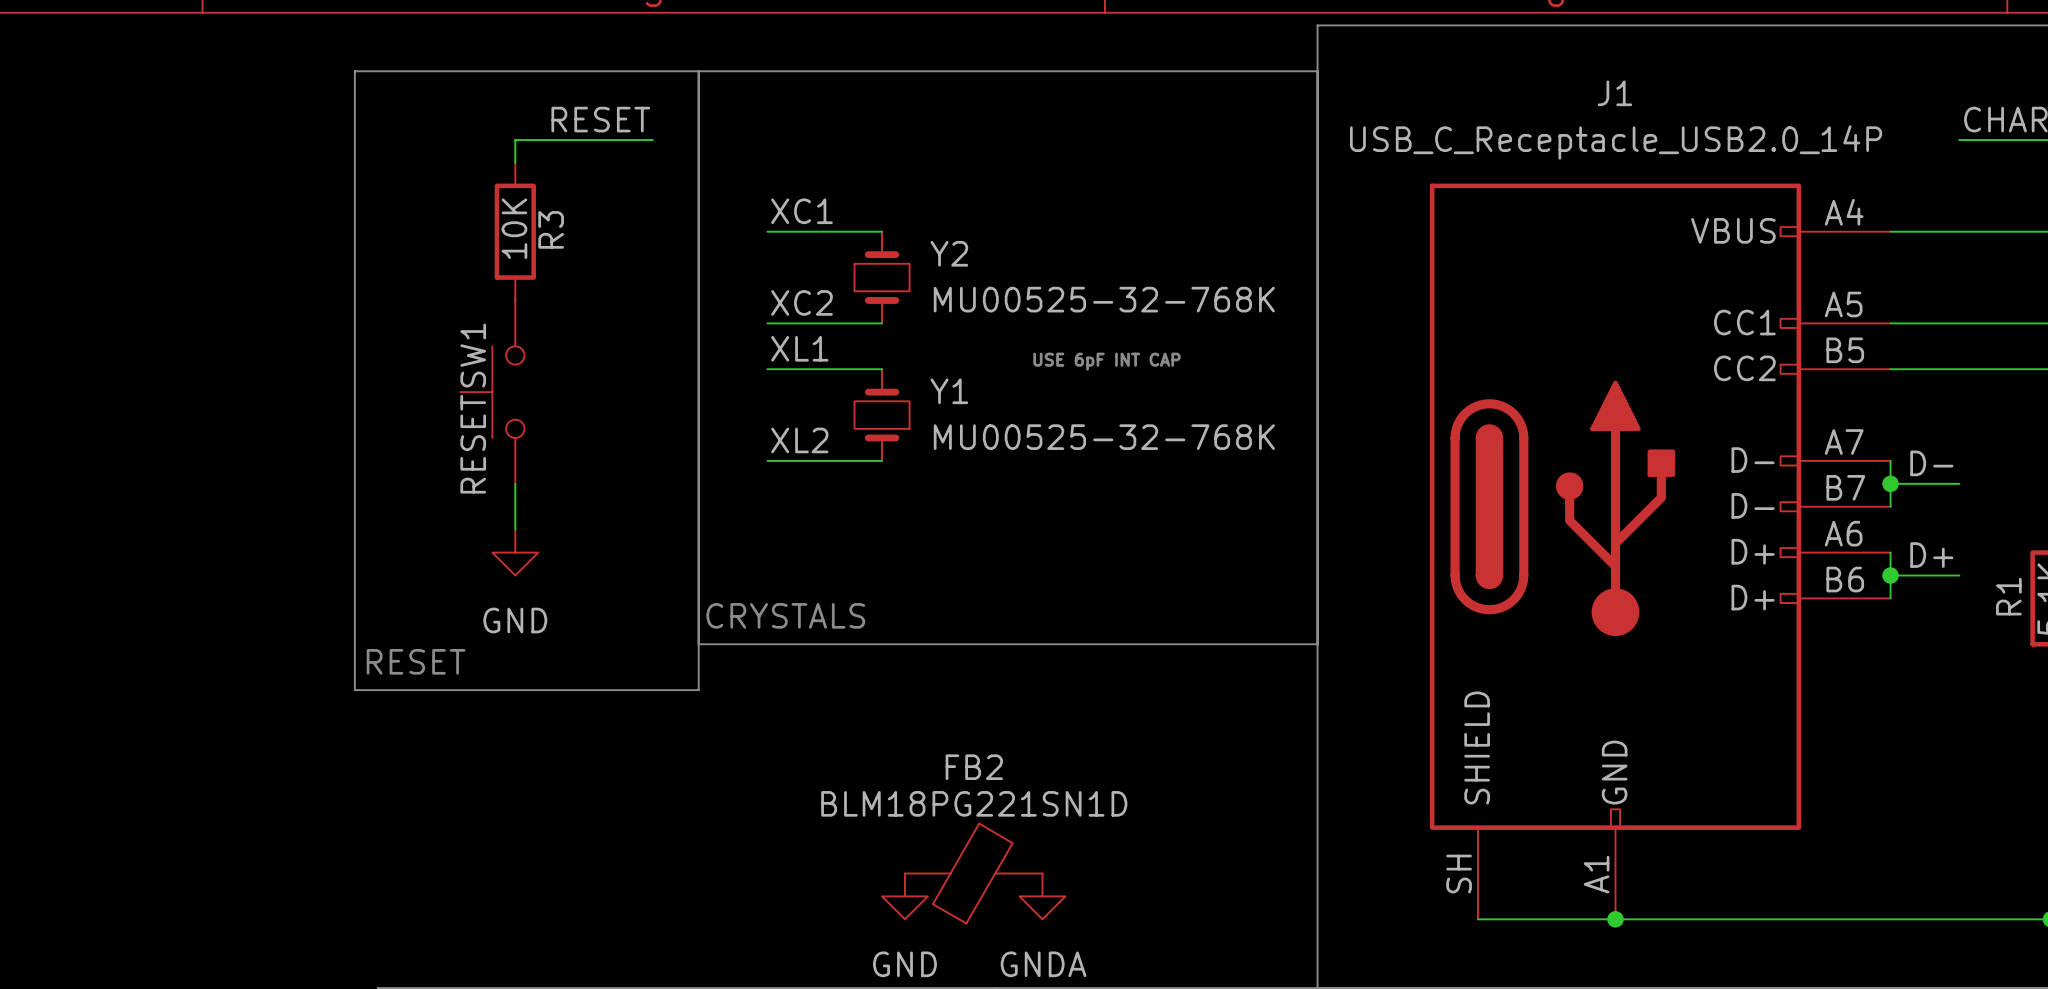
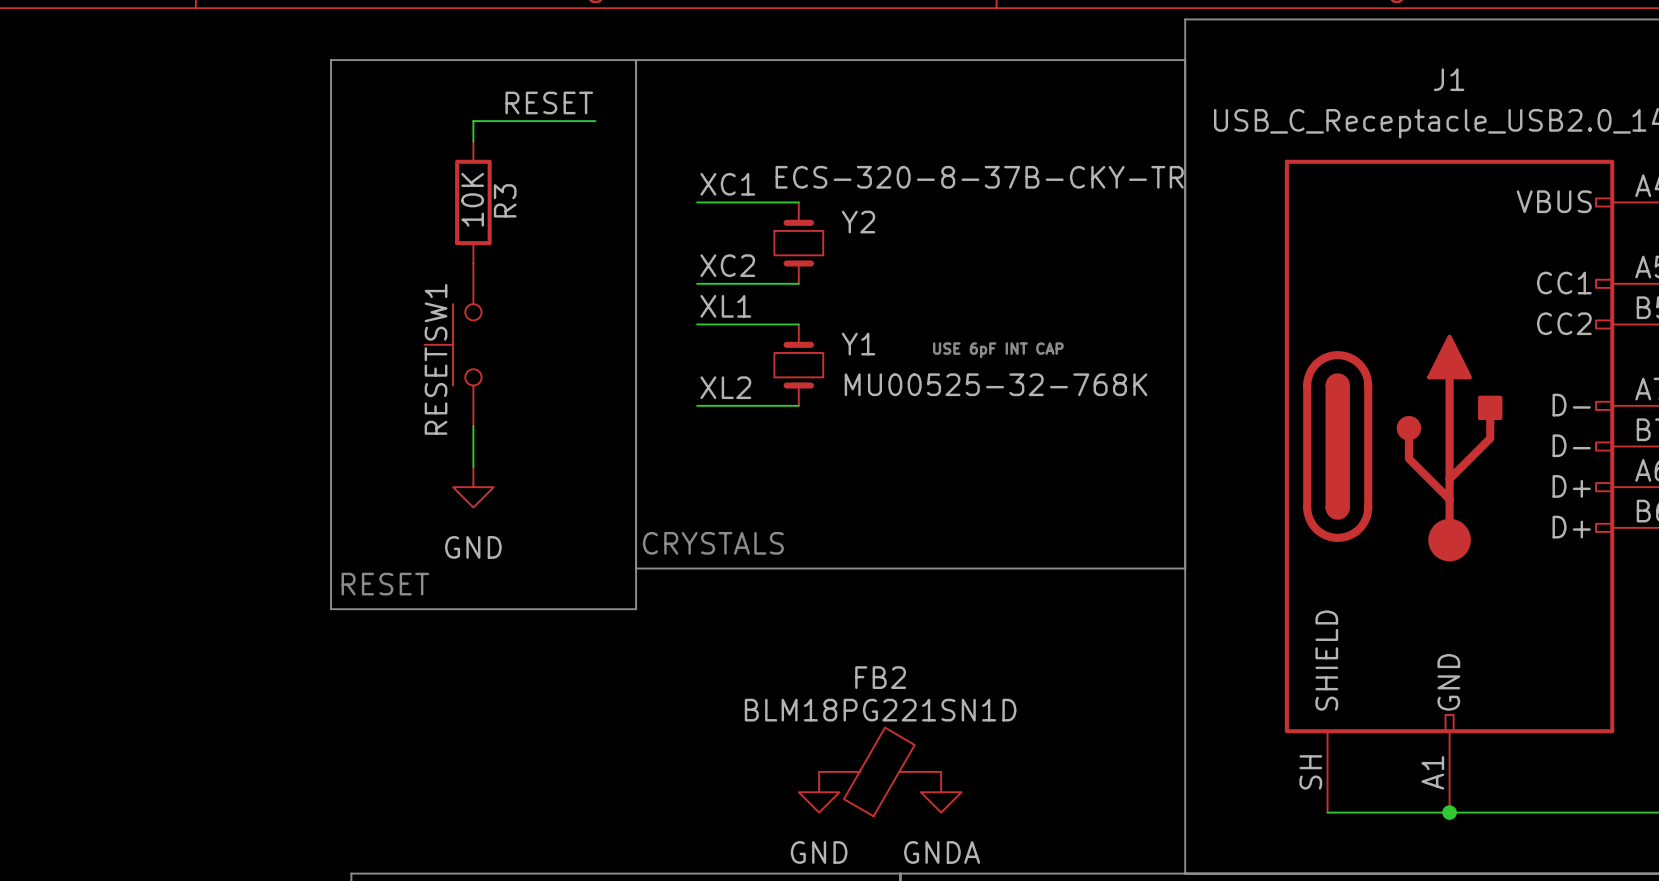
Y2 value: MU00525-32-768K (1104, 299) -> ECS-320-8-37B-CKY-TR (979, 177)
text position: USE 6pF INT CAP (1106, 361) -> USE 6pF INT CAP (998, 350)

